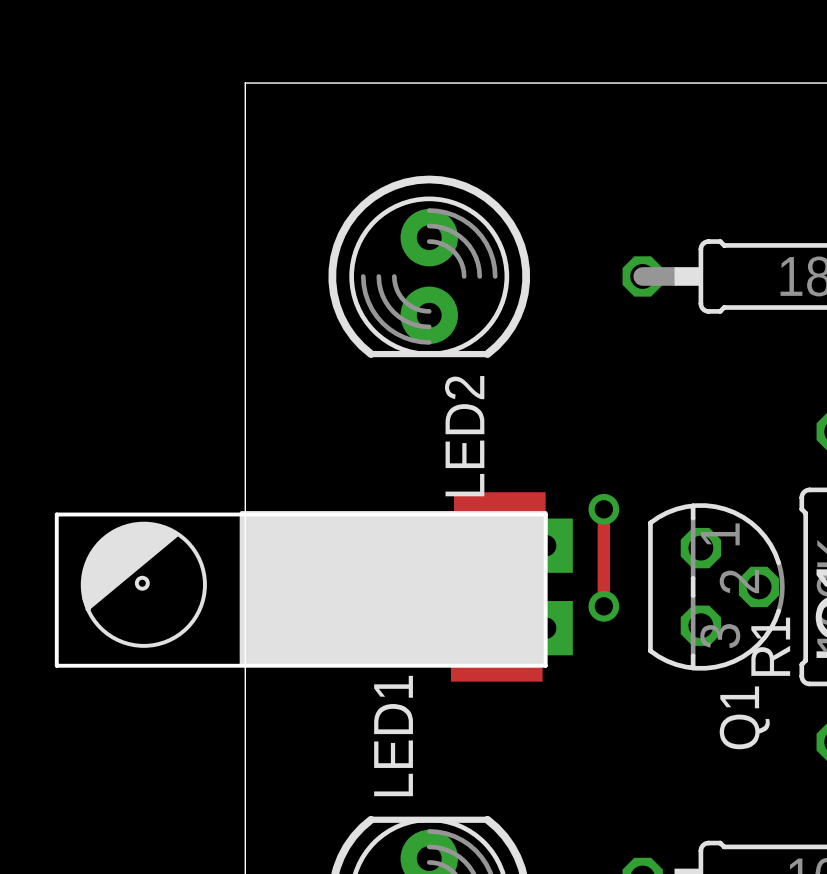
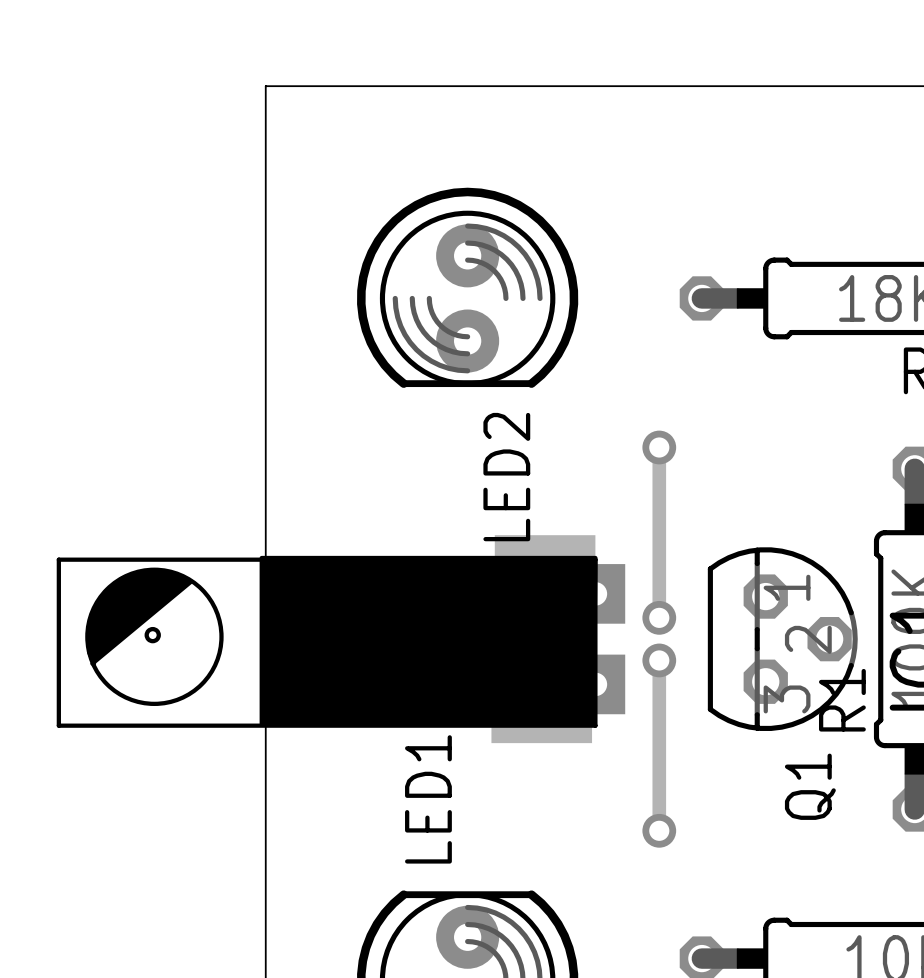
track: none -> (659, 447) (659, 553)
via: none -> (659, 447)
via: (603, 509) -> none
track: (603, 567) (603, 606) -> (659, 830) (659, 660)
via: none -> (659, 617)
via: none -> (659, 830)

